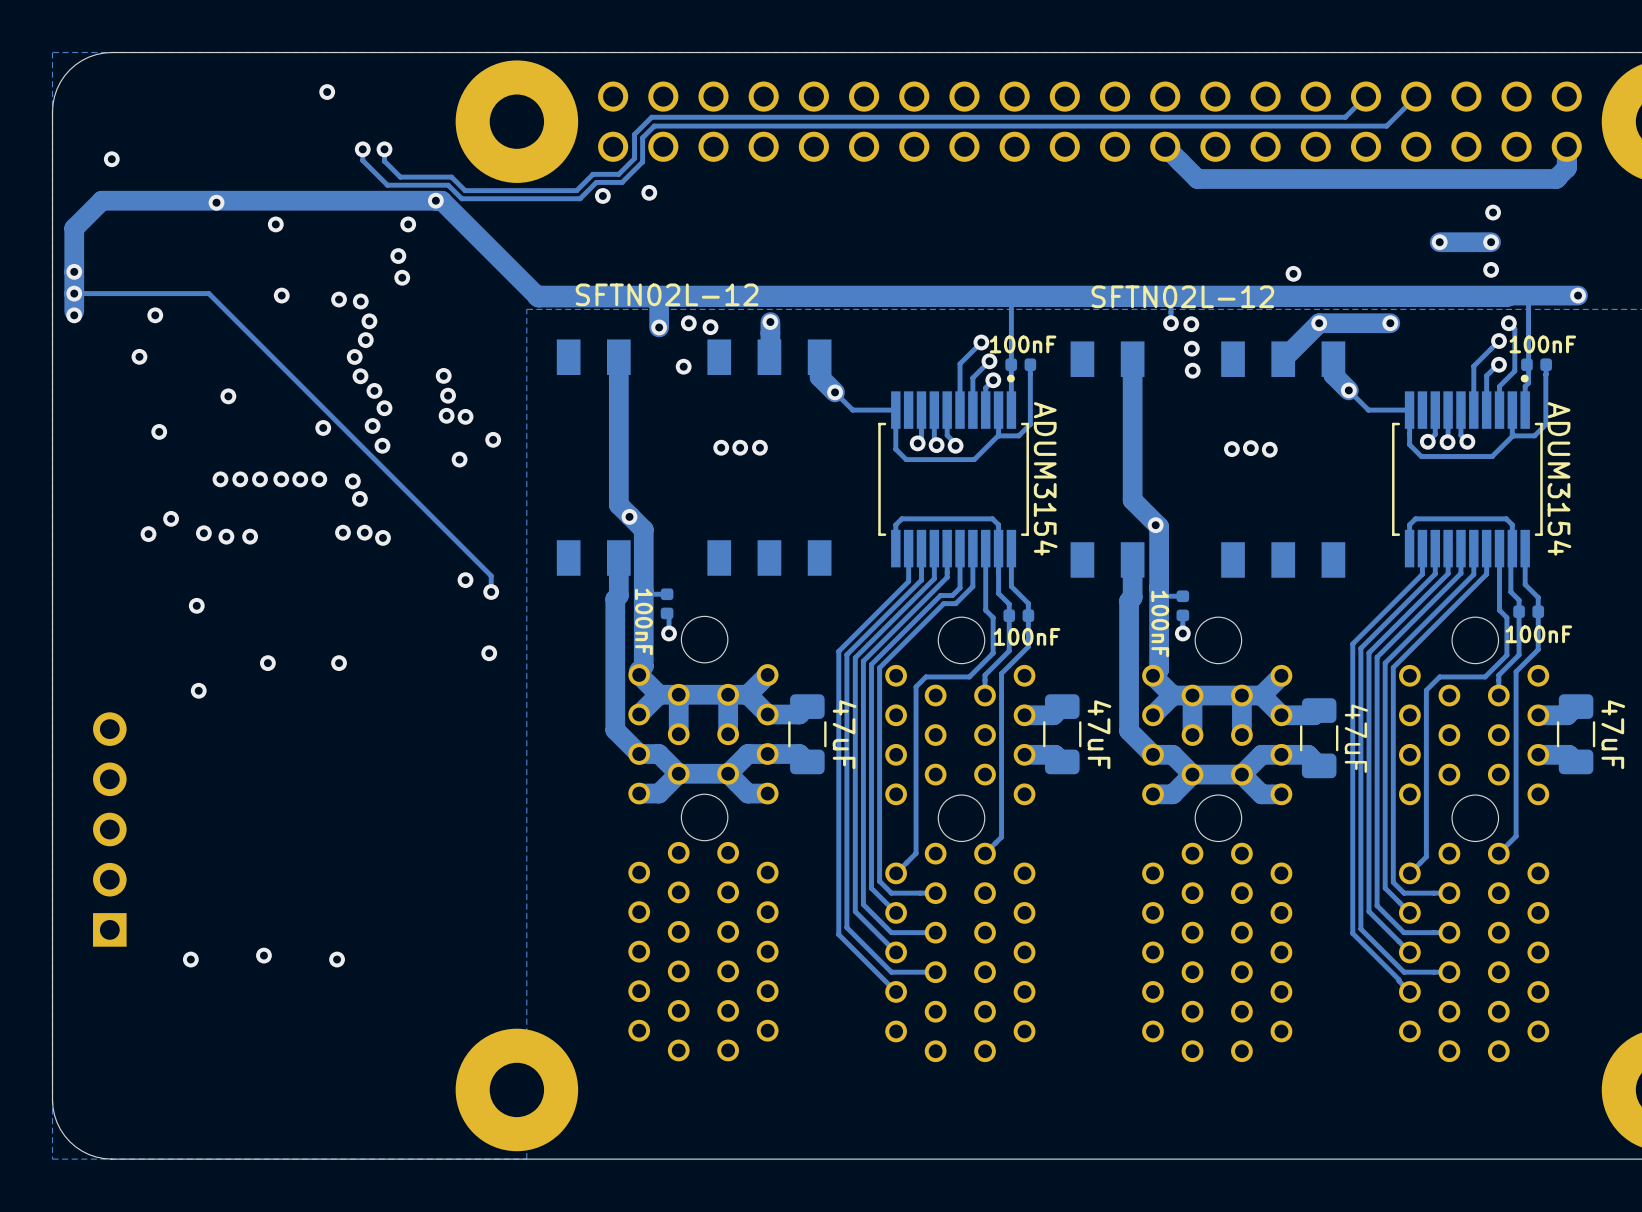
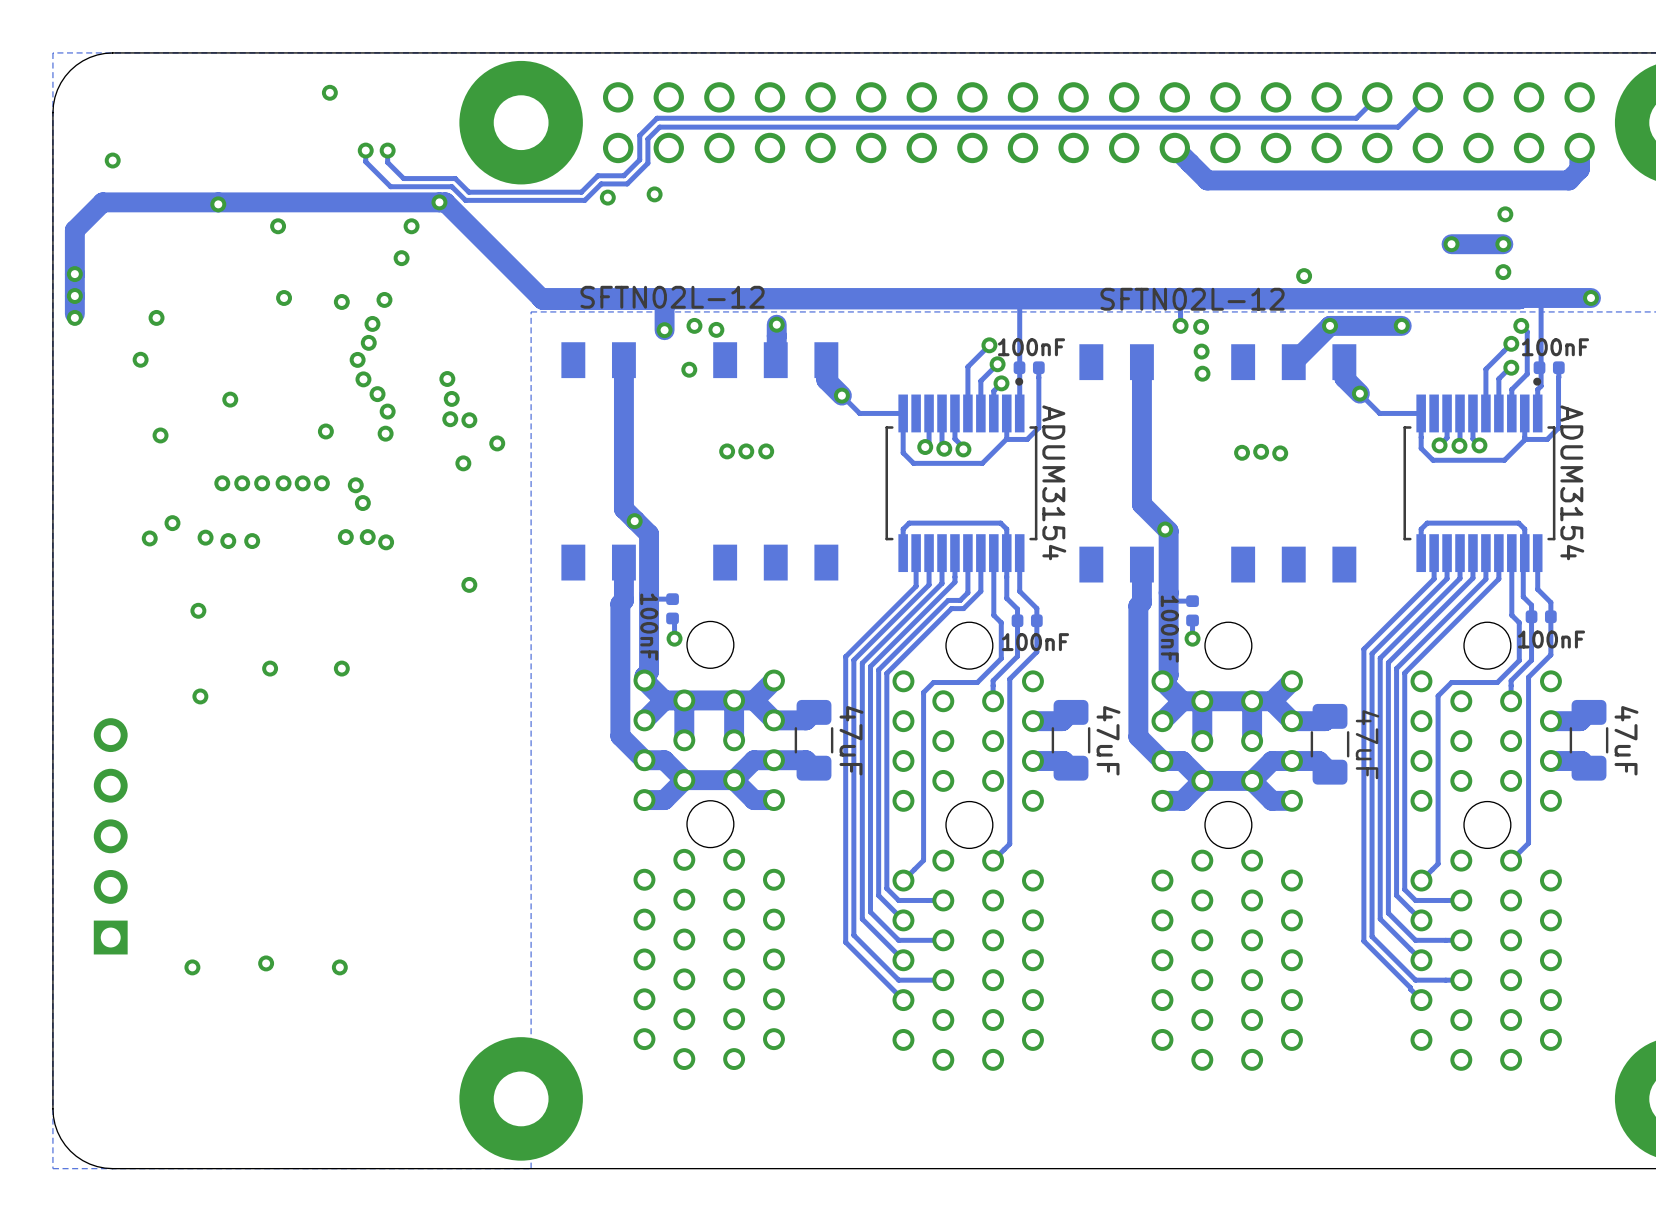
via: (402, 277) -> none
track: (74, 293) (208, 293) (491, 575) (491, 591) -> none
via: none -> (384, 299)
via: (360, 301) -> none
via: (372, 425) -> none
via: none -> (385, 433)
via: (382, 445) -> none
via: (491, 591) -> none
via: (489, 653) -> none

